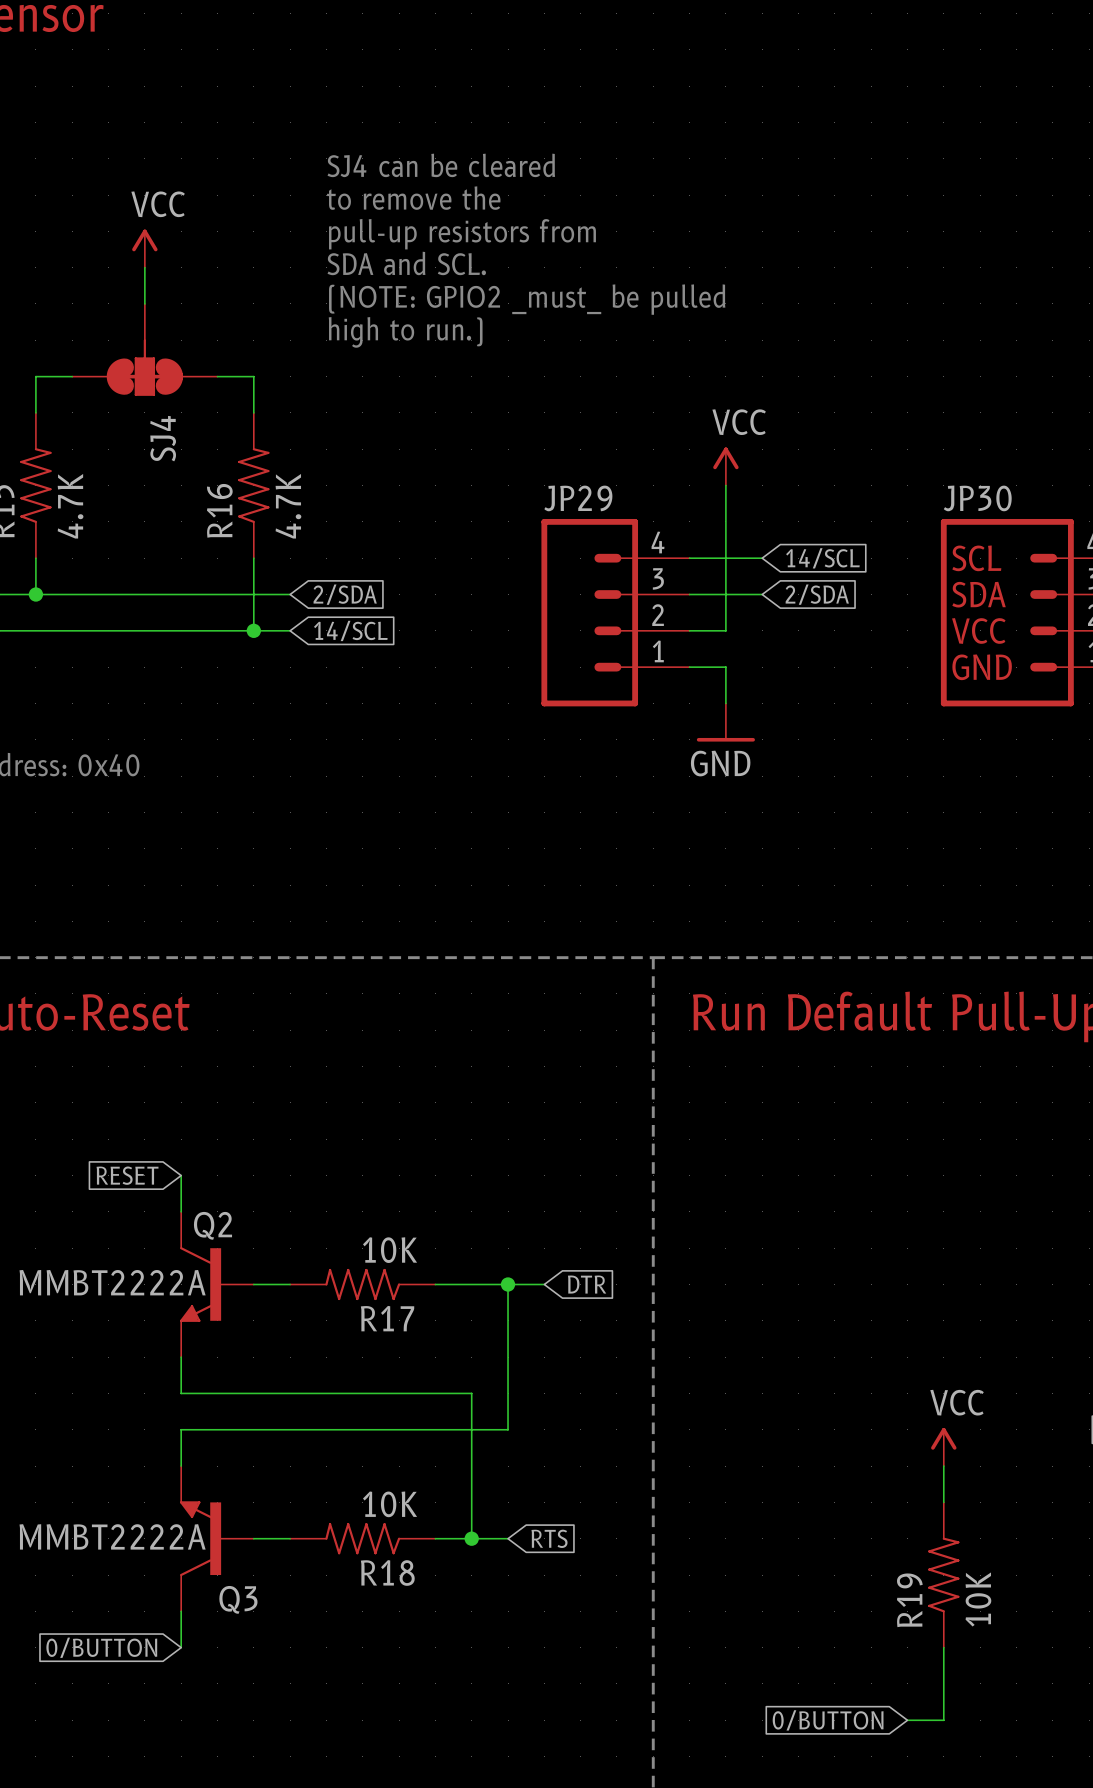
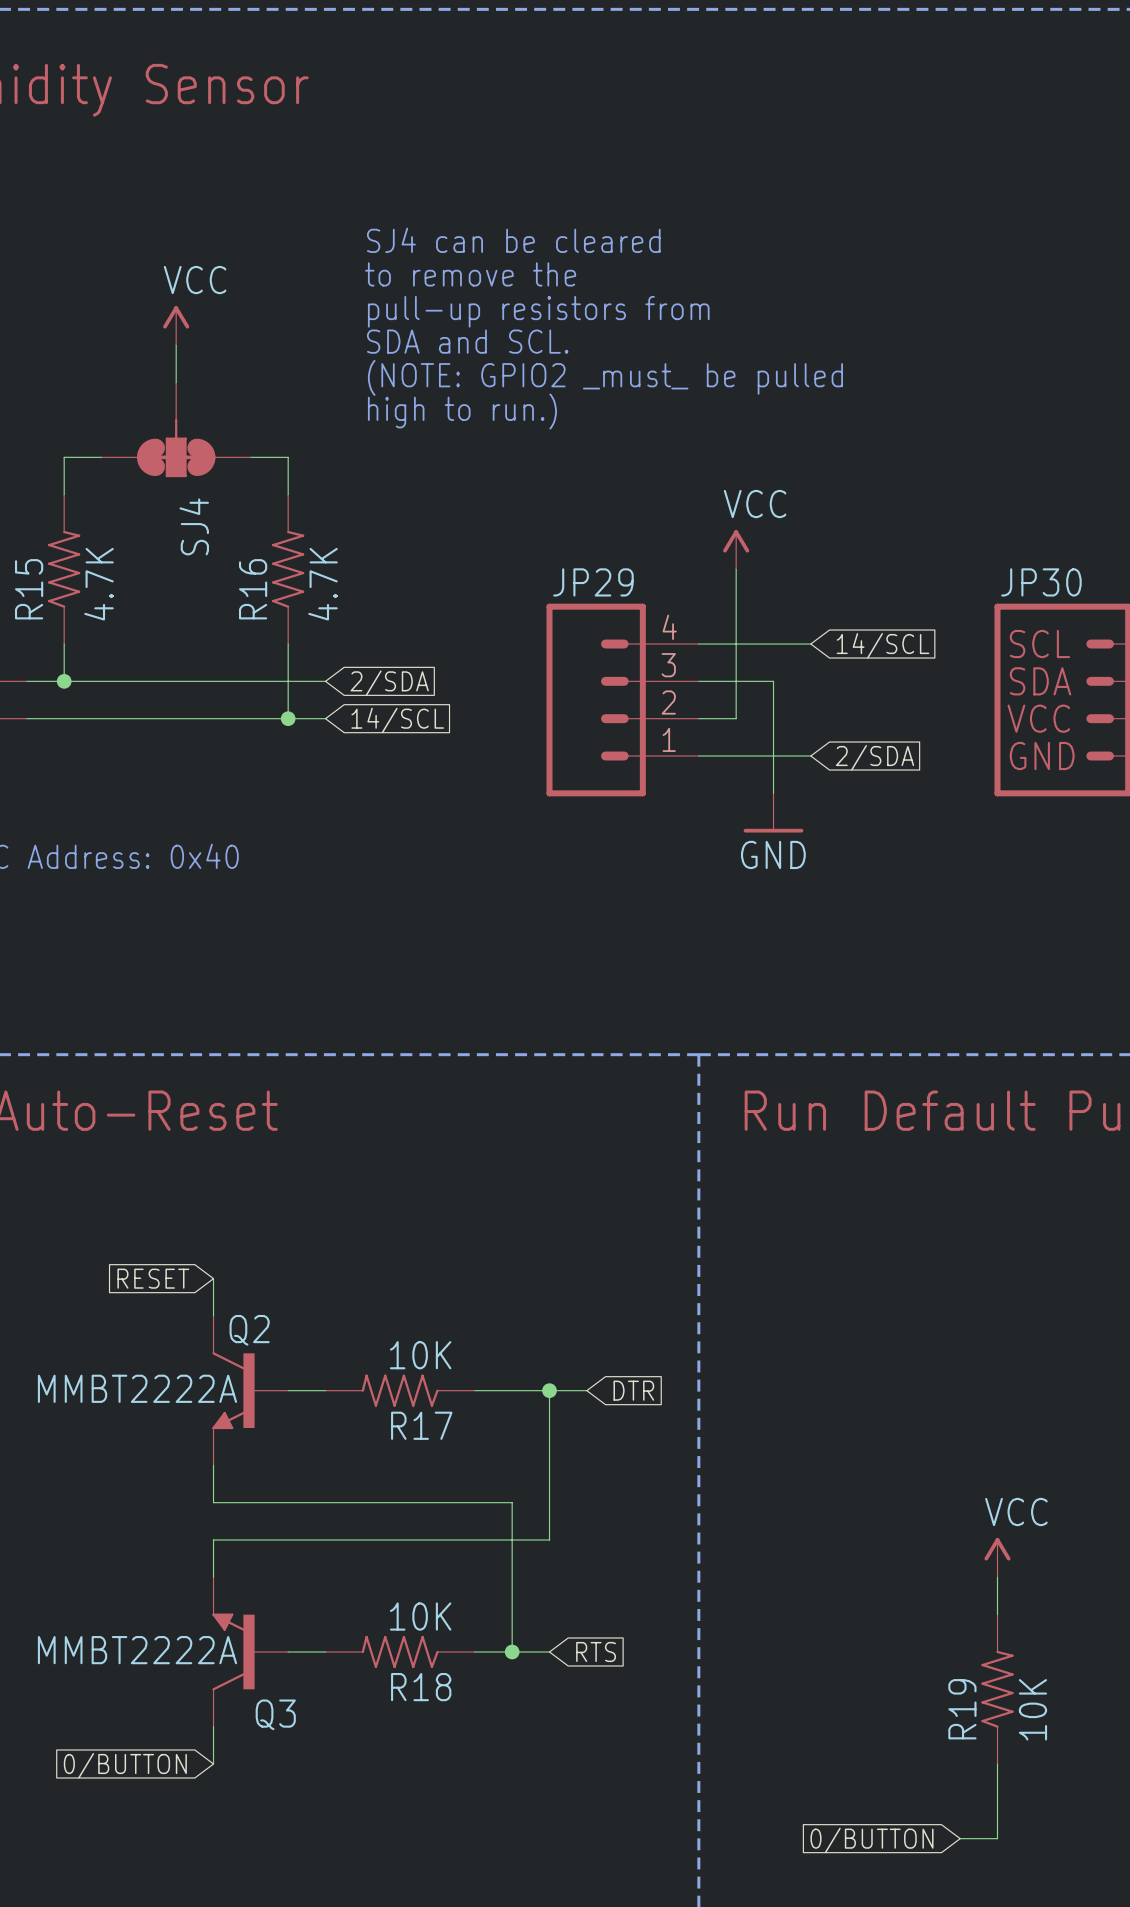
power symbol position: VCC (725, 466) -> VCC (736, 549)
wire: none -> (736, 569) (736, 718) (698, 718)
wire: (725, 485) (725, 594) (762, 594) -> none
global label position: 2/SDA (817, 594) -> 2/SDA (875, 757)
JP29 position: (615, 612) -> (622, 700)
wire: (689, 630) (725, 630) -> (810, 756) (773, 756) (773, 718)

